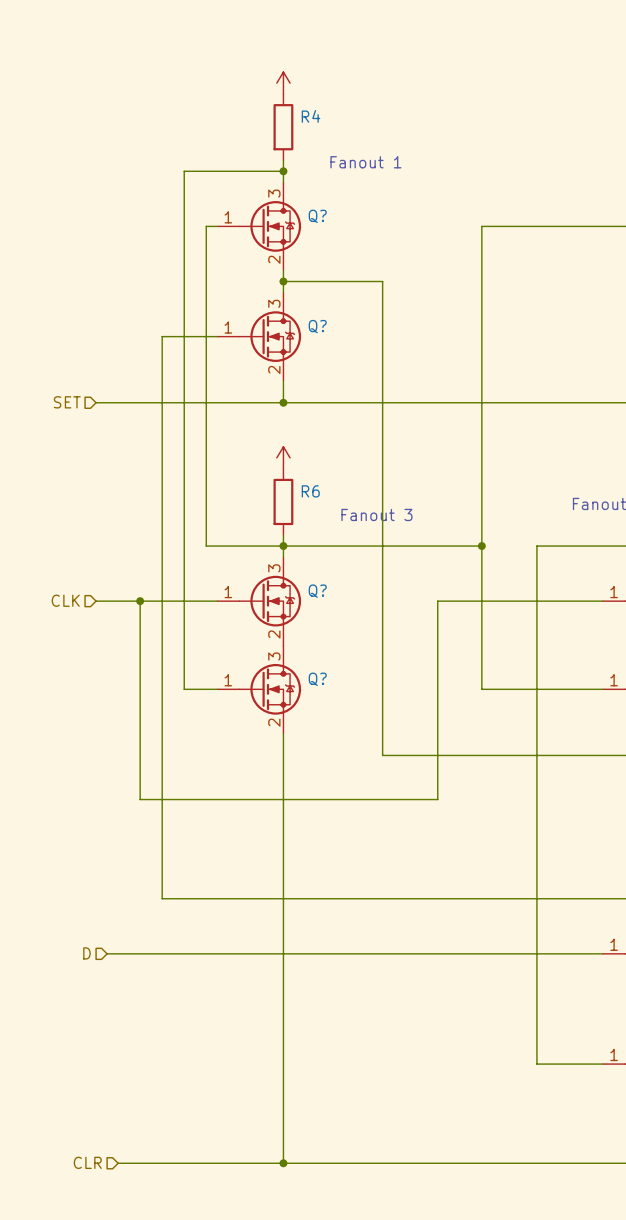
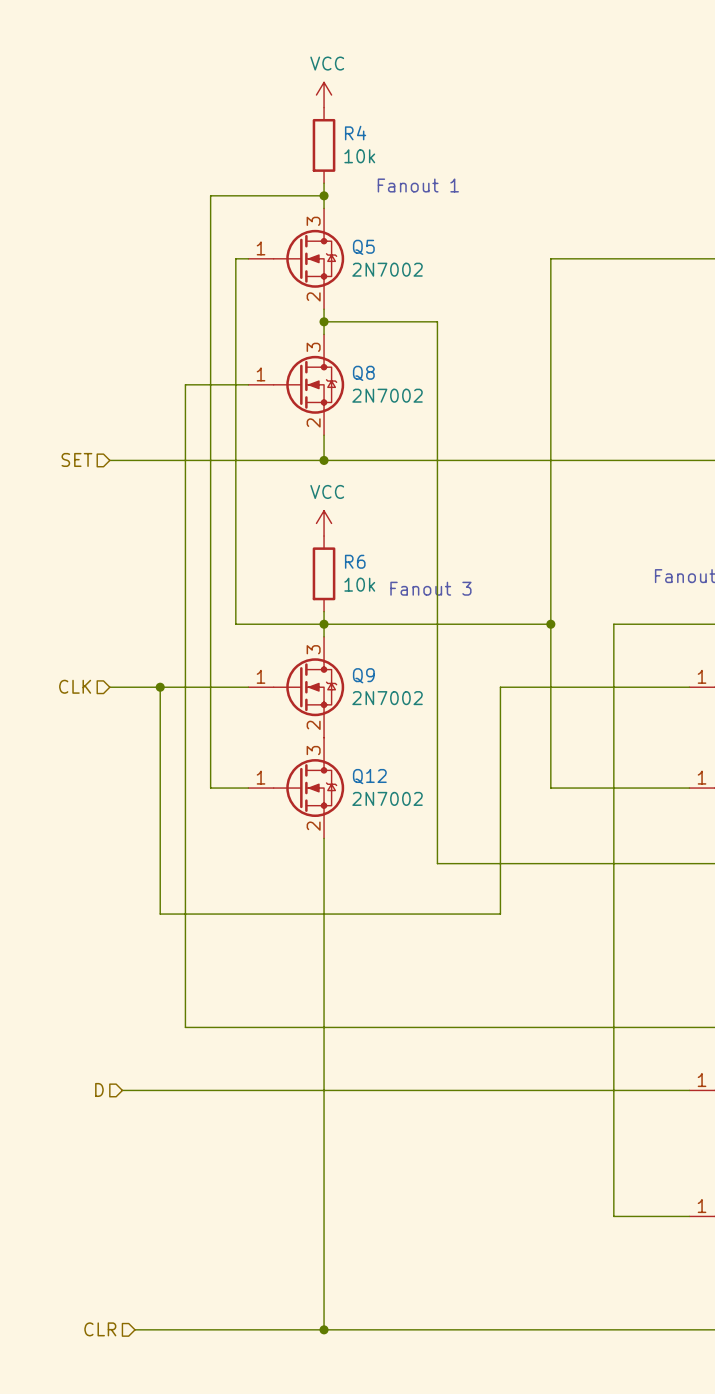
power symbol text: none -> VCC (327, 63)
R4 value: none -> 10k (359, 156)
Q? name: Q? (317, 216) -> Q5 (363, 247)
Q? value: none -> 2N7002 (387, 269)
Q? name: Q? (317, 326) -> Q8 (363, 373)
Q? value: none -> 2N7002 (387, 395)
power symbol text: none -> VCC (327, 491)
R6 value: none -> 10k (359, 584)
Q? name: Q? (317, 591) -> Q9 (363, 675)
Q? value: none -> 2N7002 (387, 698)
Q? name: Q? (317, 679) -> Q12 (369, 776)
Q? value: none -> 2N7002 (387, 798)

